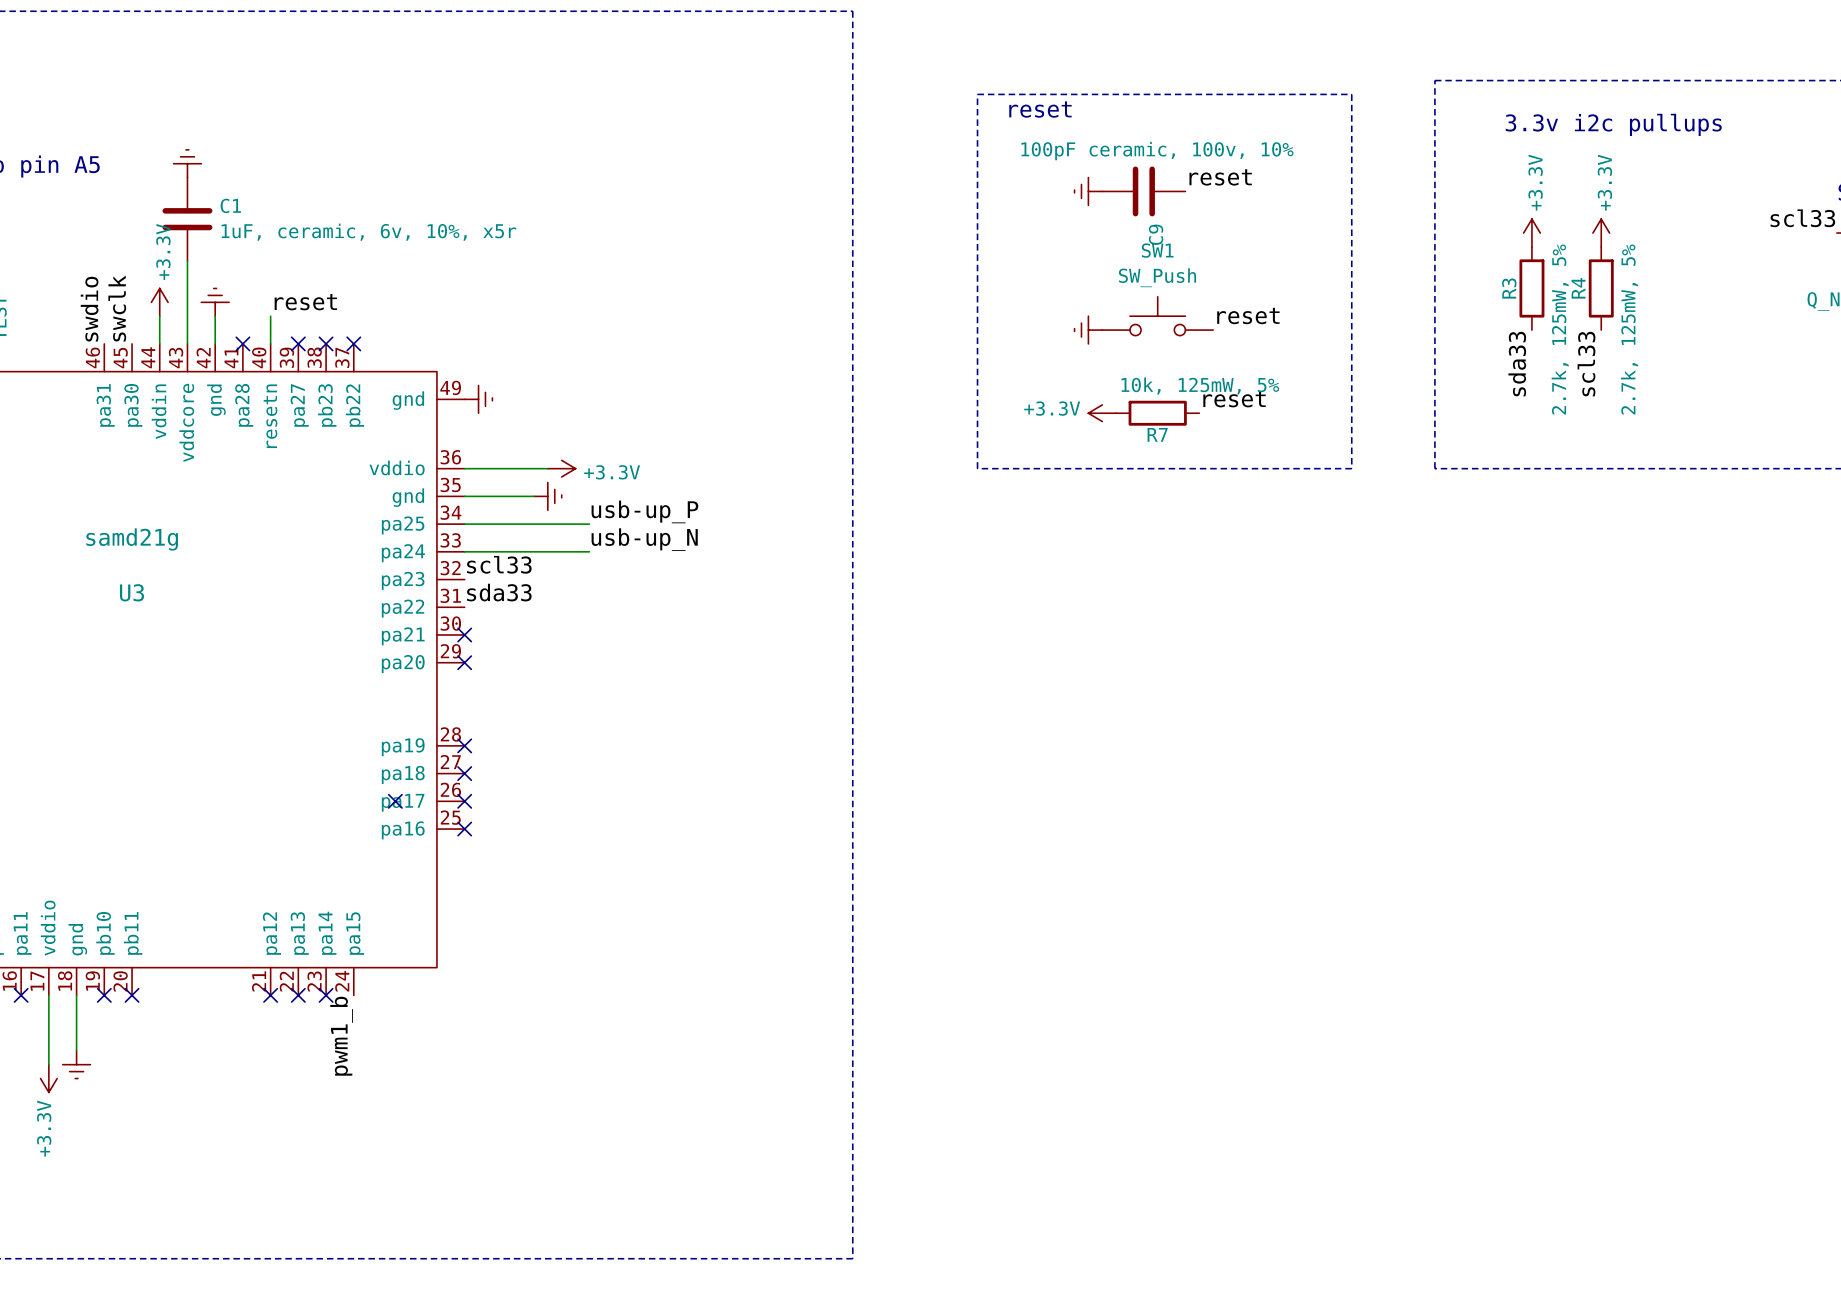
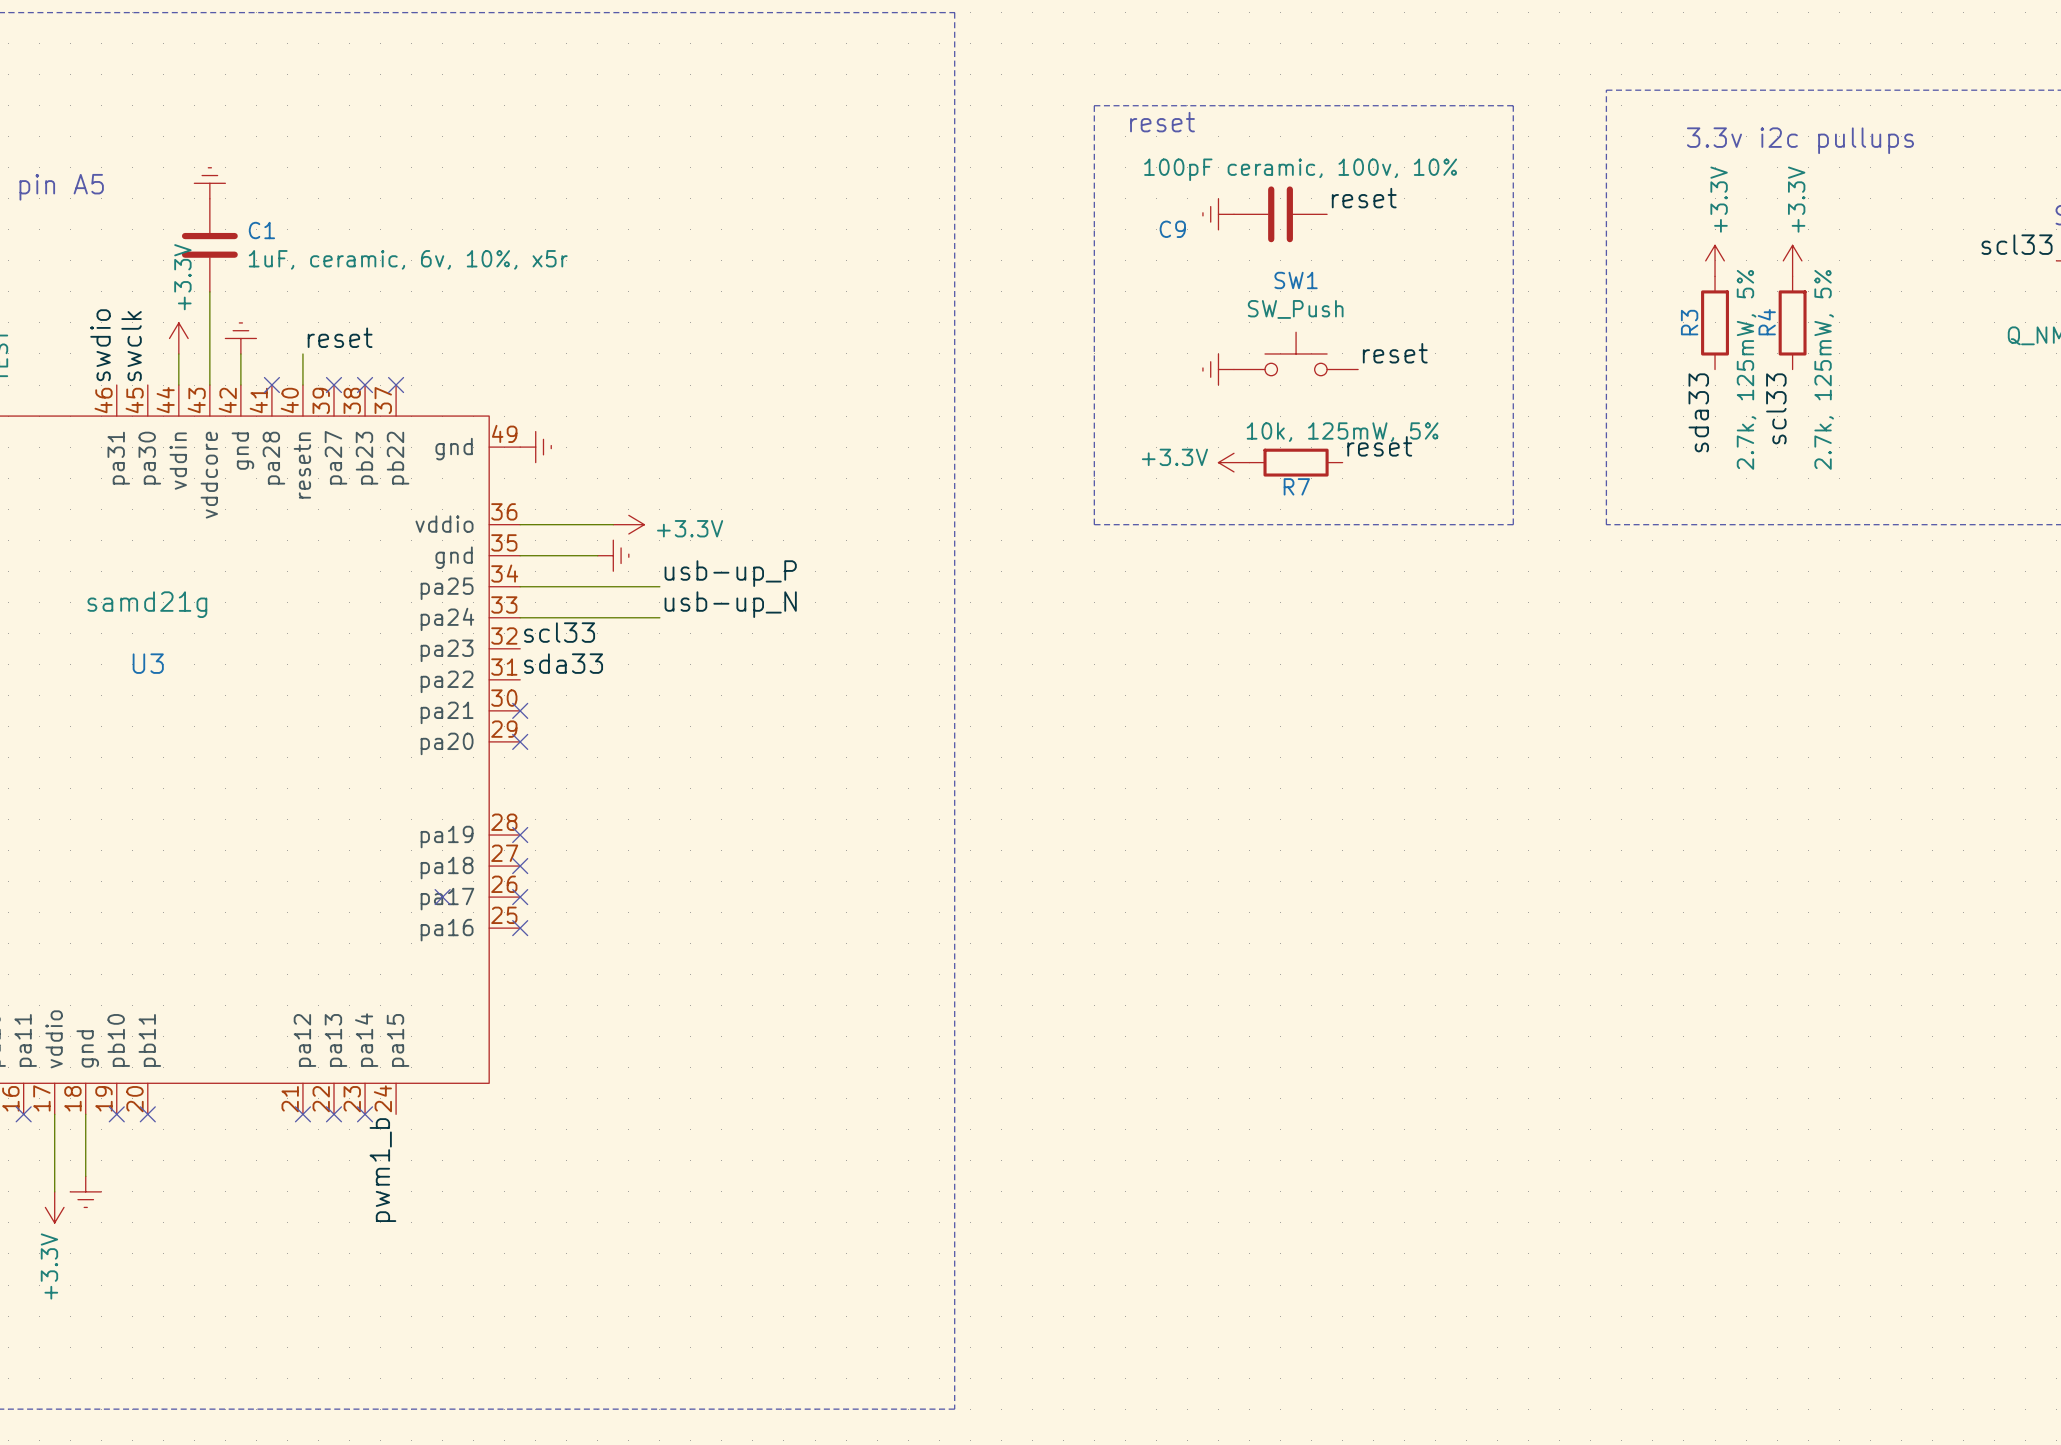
C9 name rotation: 0° (1156, 234) -> 90° clockwise (1172, 229)
C9 name position: C9 (1156, 234) -> C9 (1172, 229)

